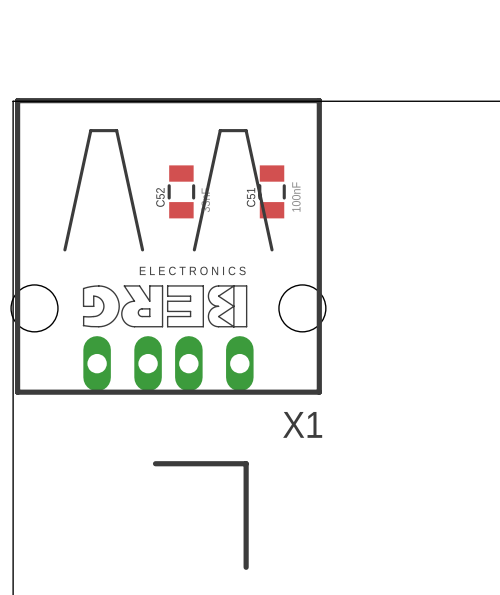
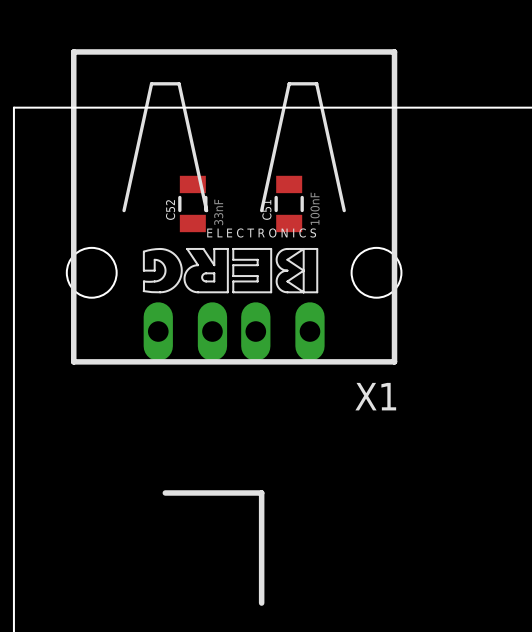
X1 position: (168, 246) -> (234, 206)

